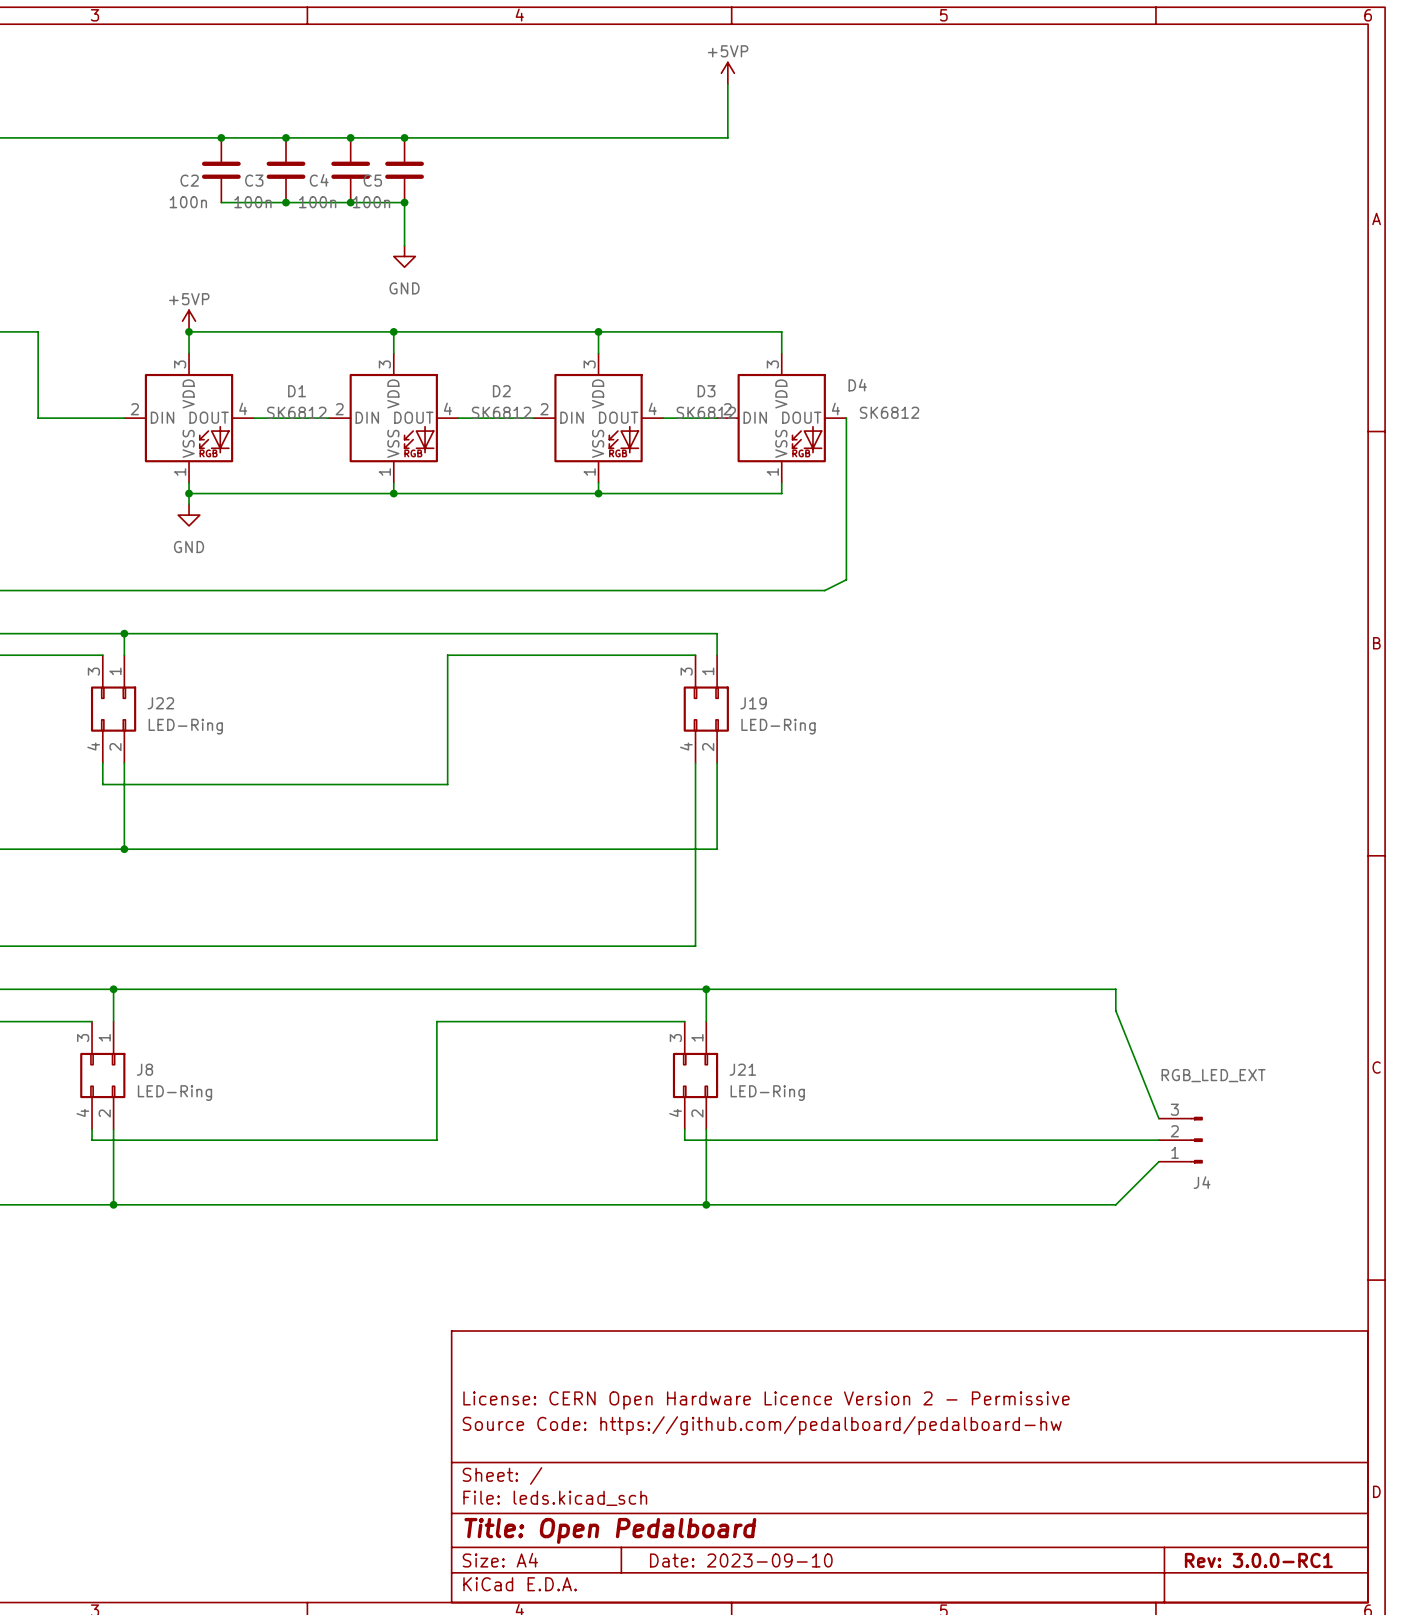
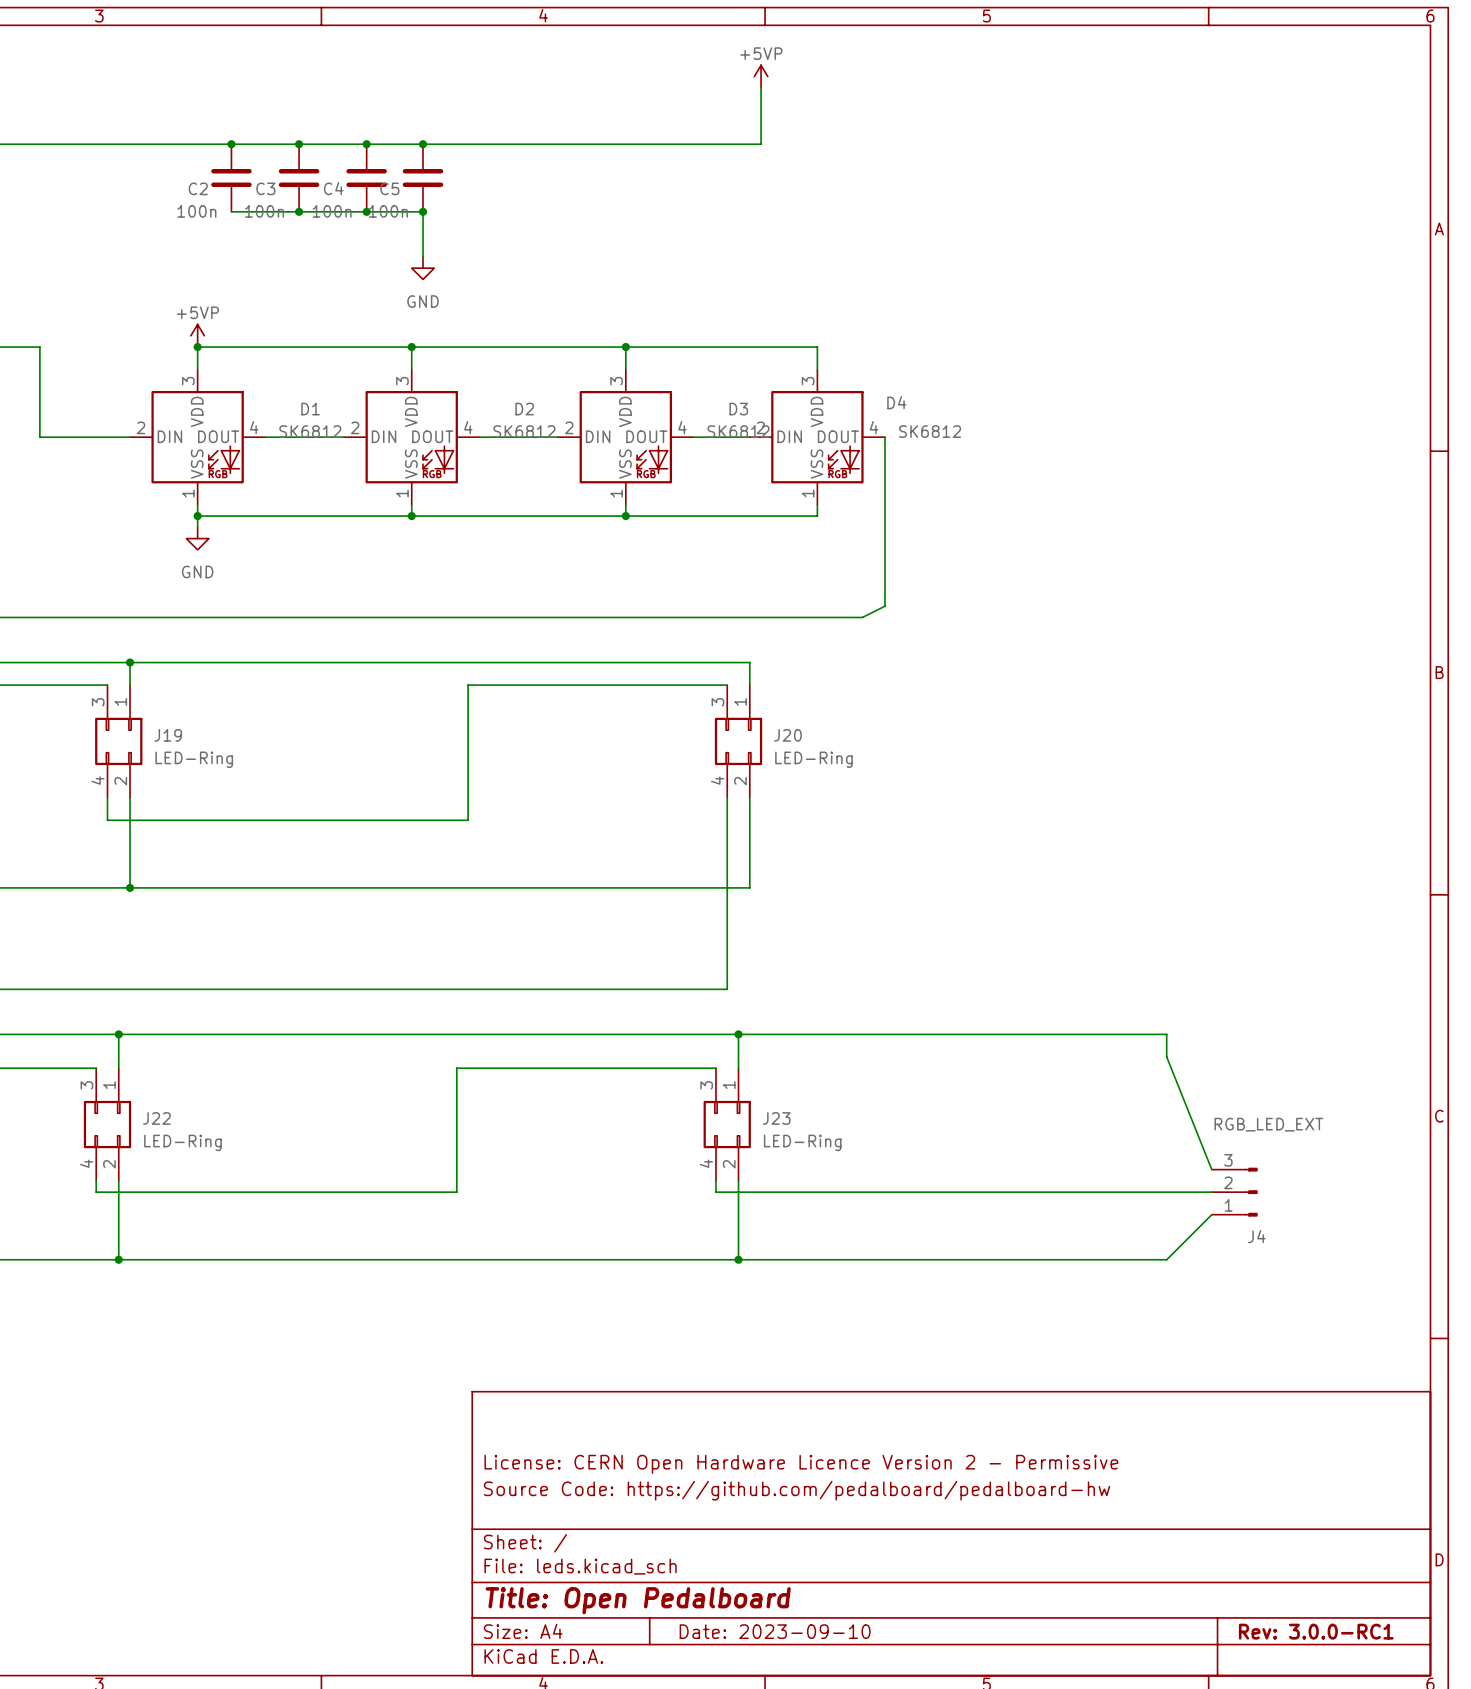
J22 name: J22 (160, 703) -> J19 (168, 735)
J19 name: J19 (753, 703) -> J20 (787, 735)
J8 name: J8 (144, 1069) -> J22 (156, 1118)
J21 name: J21 (742, 1069) -> J23 (776, 1118)

